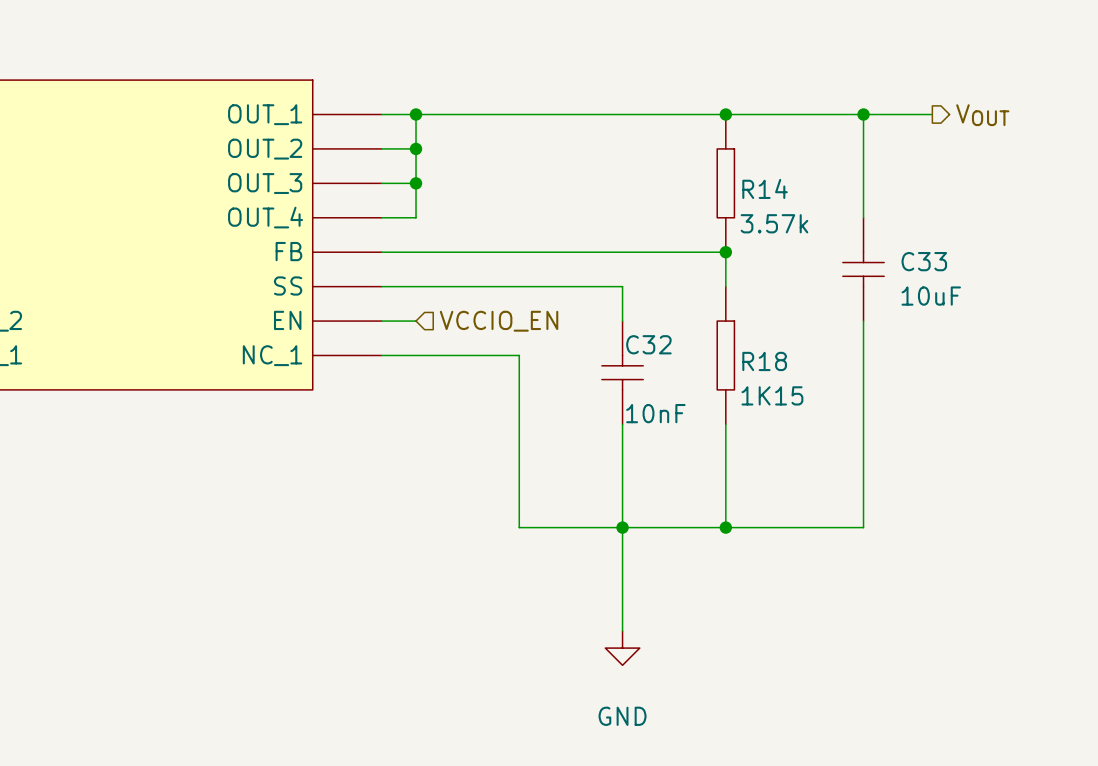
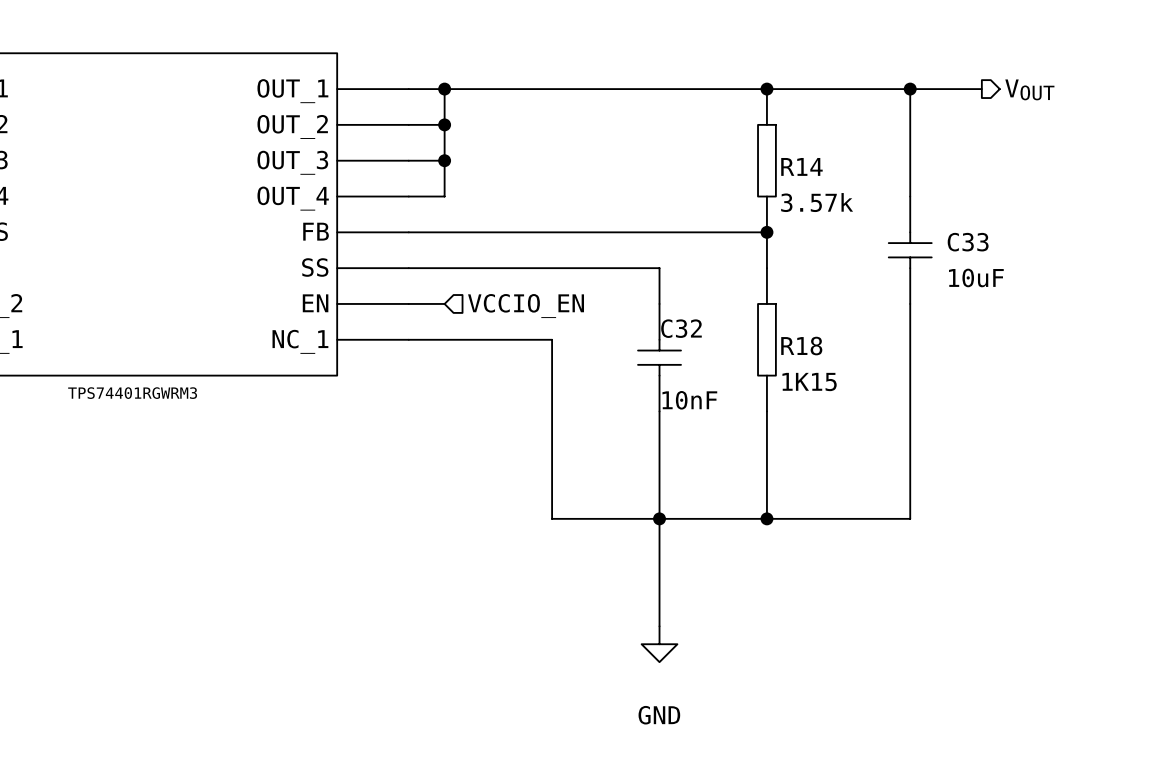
part value: none -> TPS74401RGWRM3 (132, 393)

